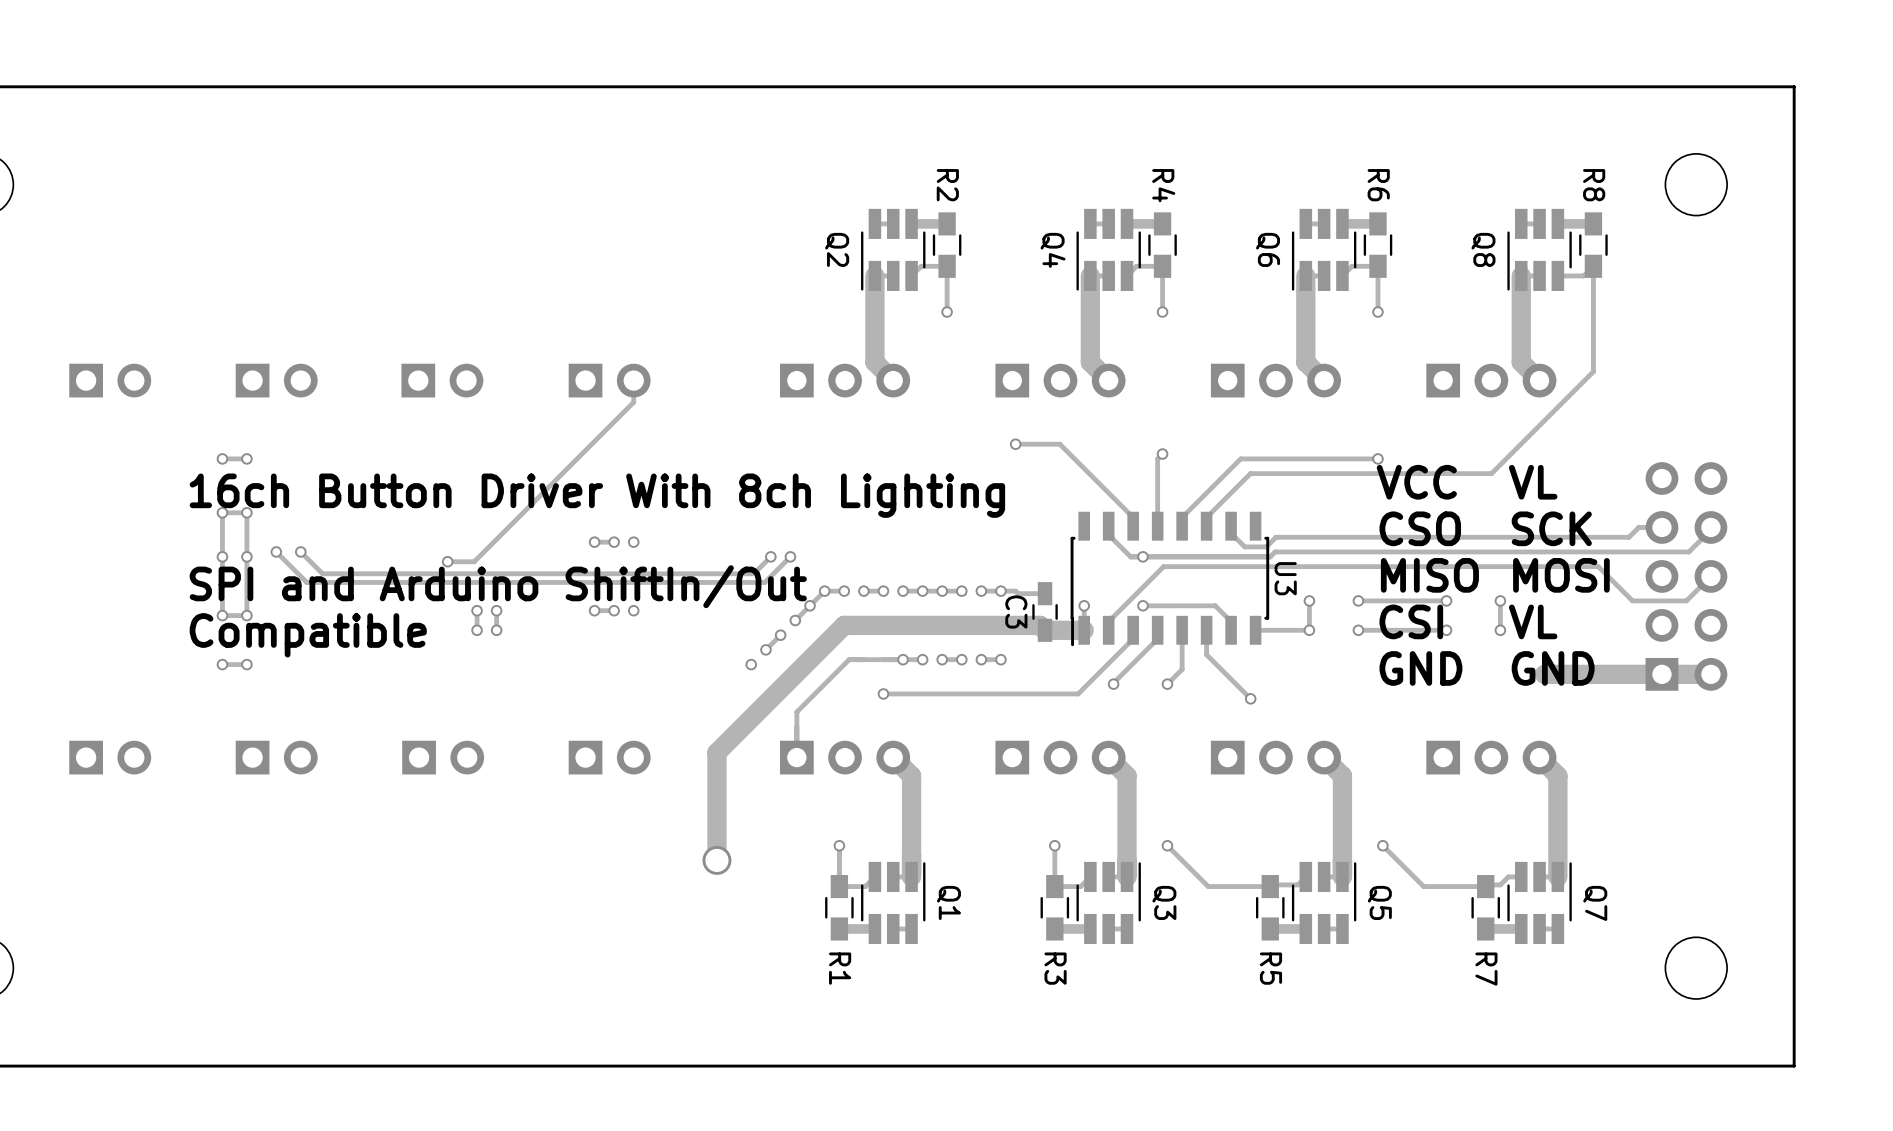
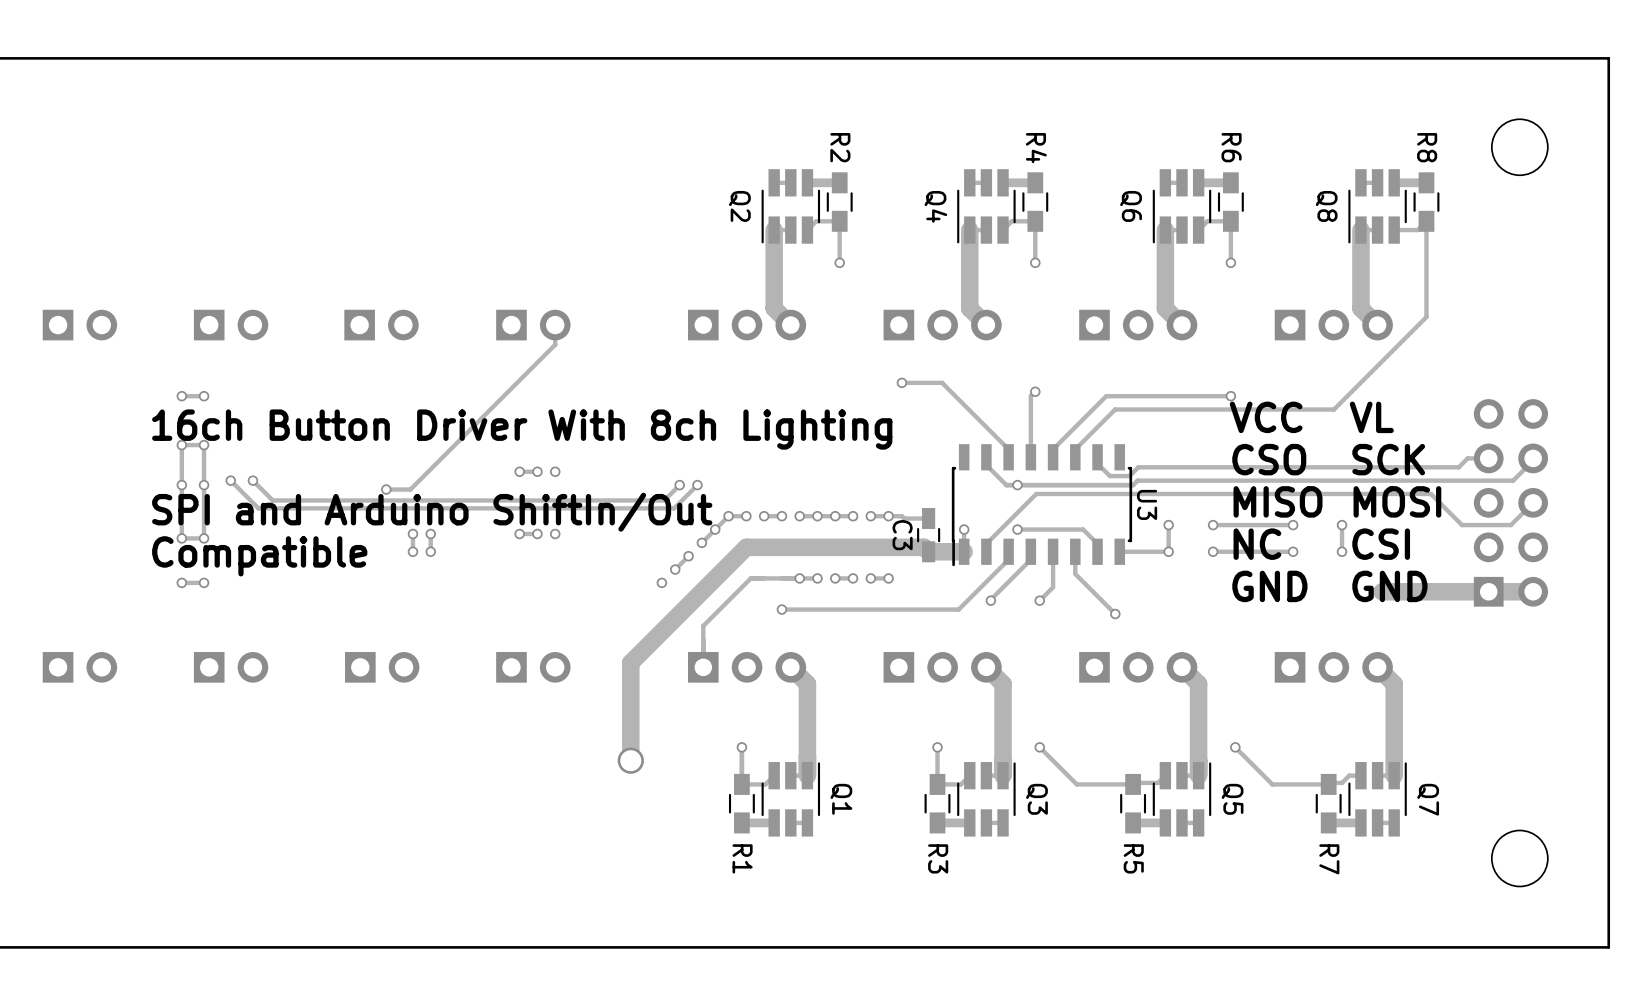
text: CSI (1411, 621) -> NC (1257, 544)
text: VL (1533, 621) -> CSI (1381, 544)

